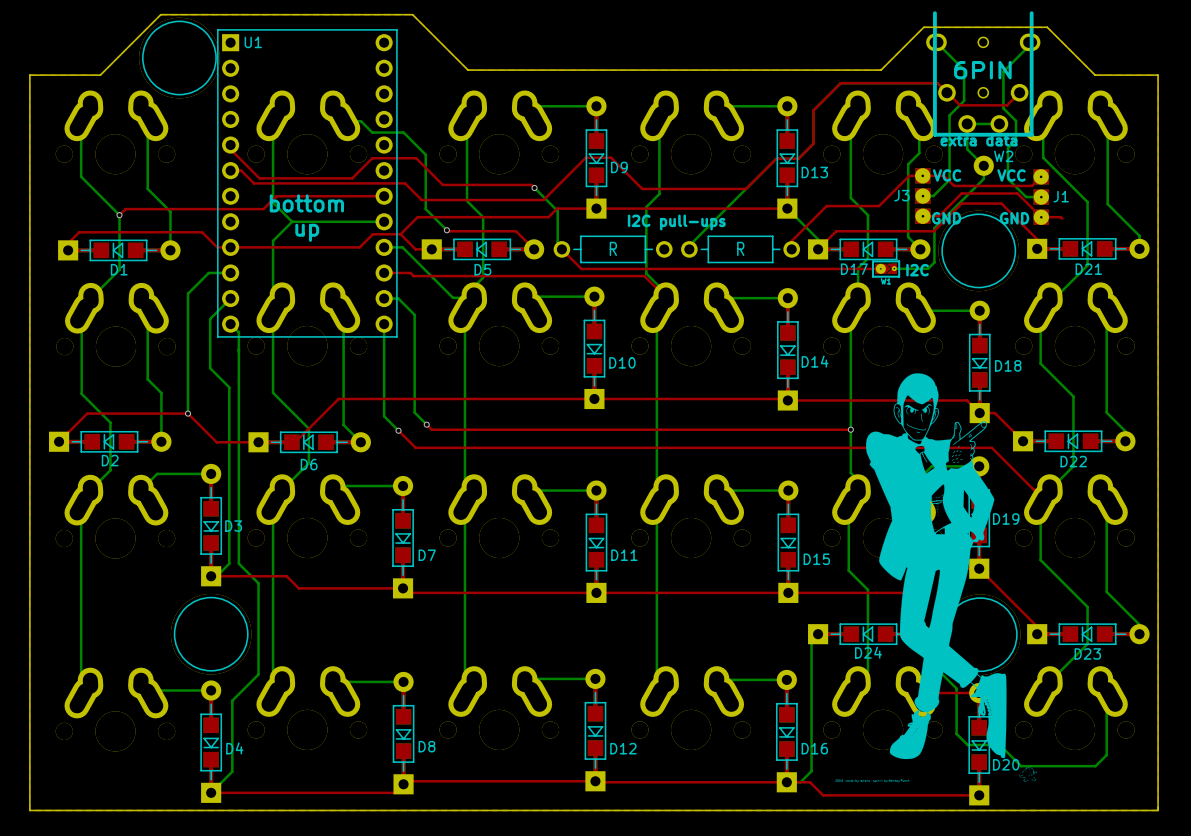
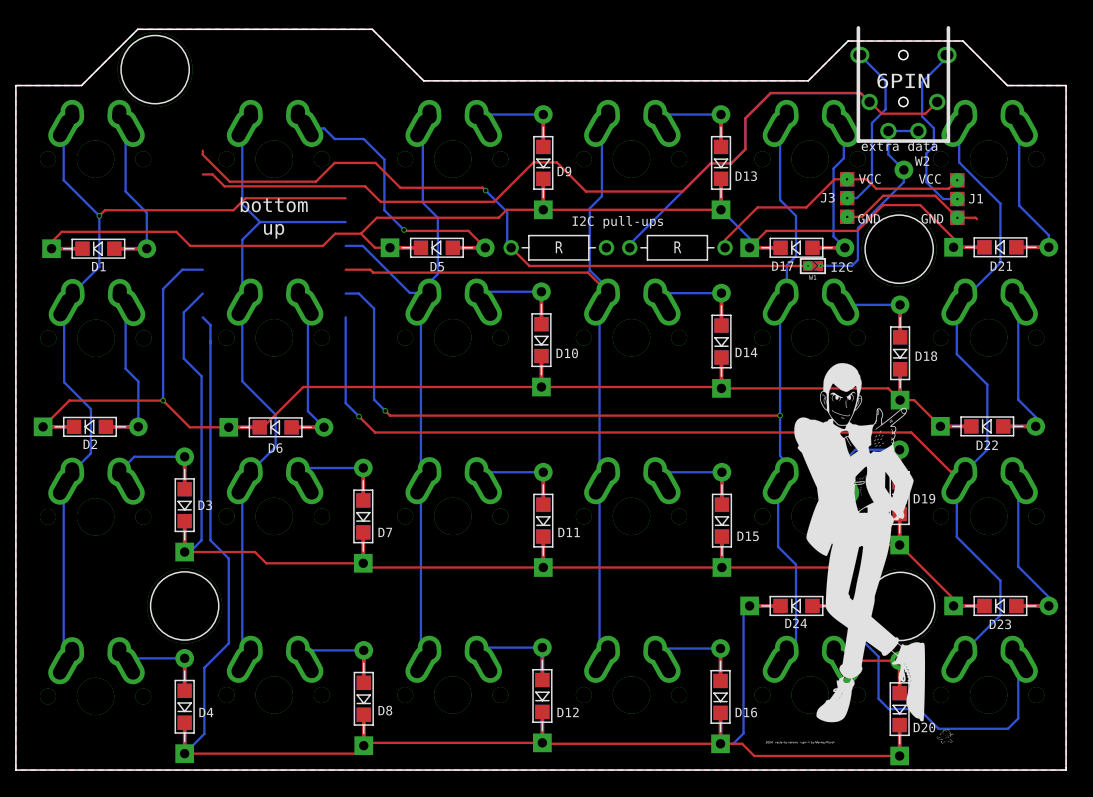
U1: (307, 183) -> none

